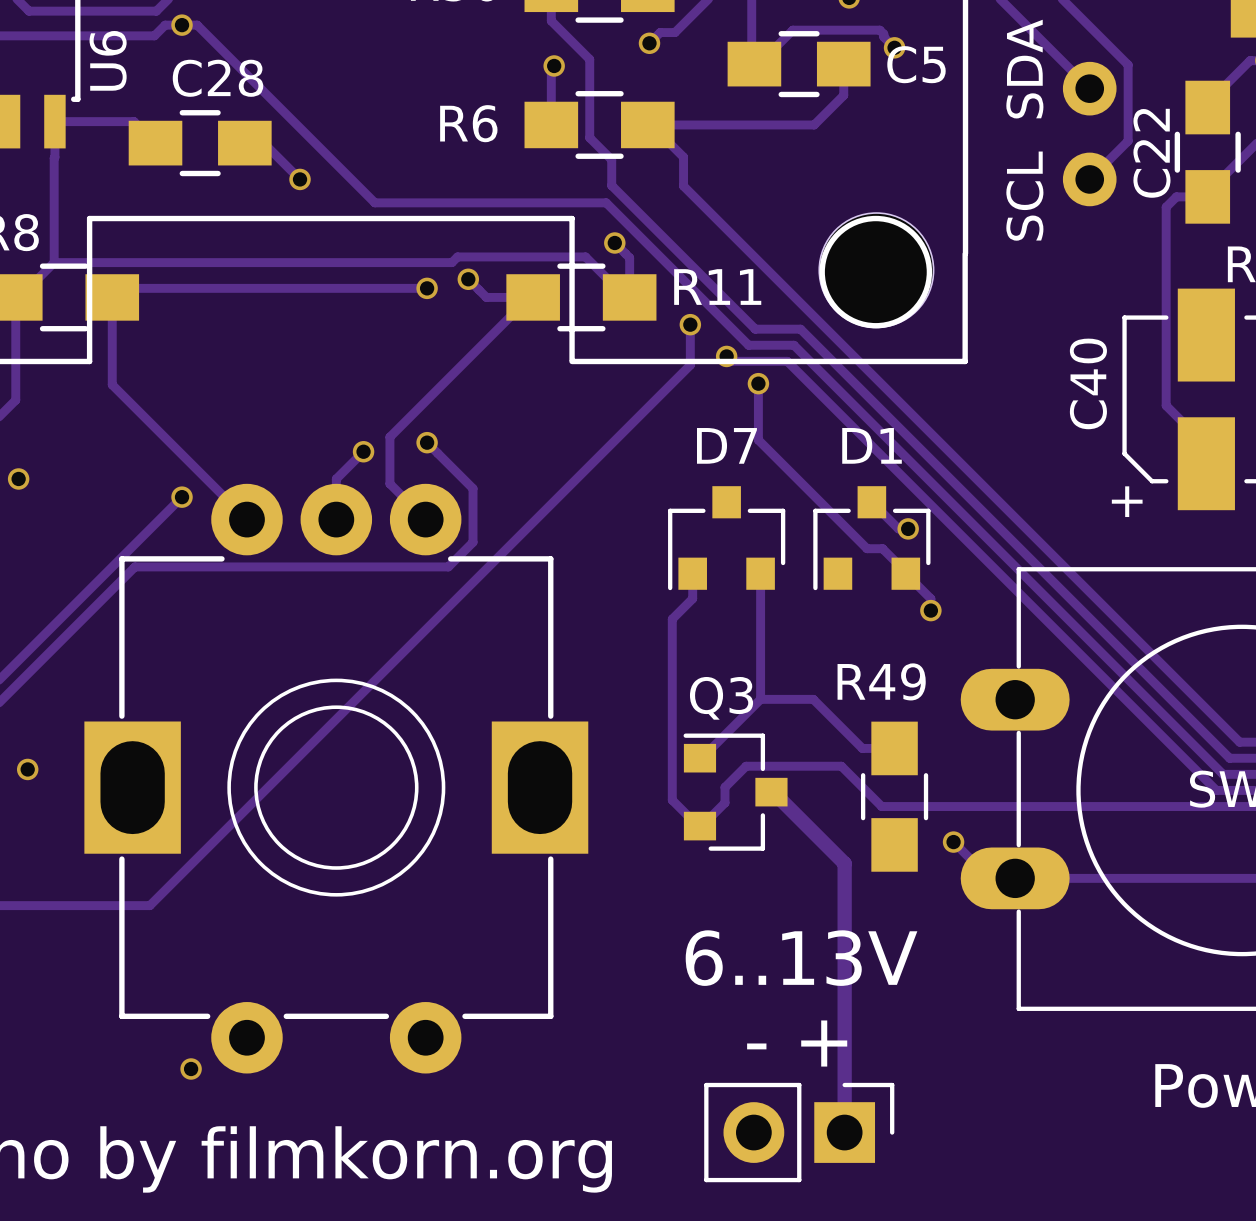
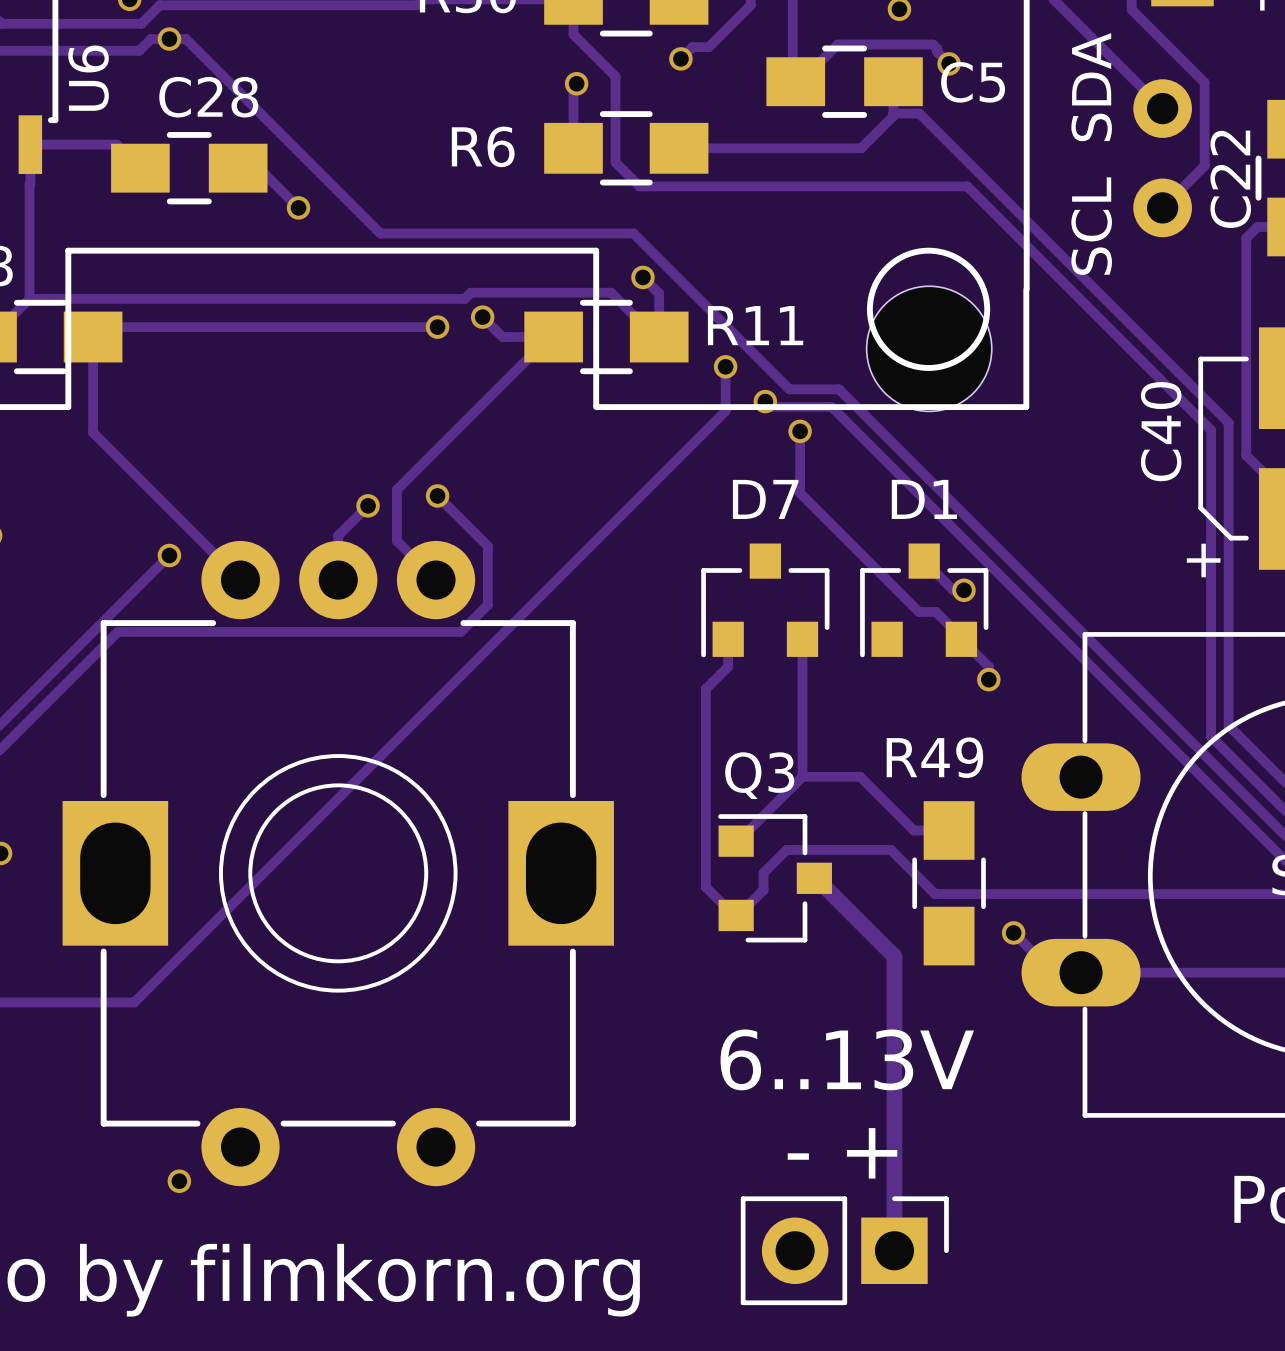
track: (651, 124) (683, 157) (683, 186) (1150, 652) -> (893, 113) (919, 113) (1228, 422) (1228, 725)
track: (611, 159) (611, 185) (755, 329) (800, 329) (1134, 662) -> (639, 186) (967, 186) (1211, 430) (1211, 736)
part position: (876, 270) -> (929, 348)

